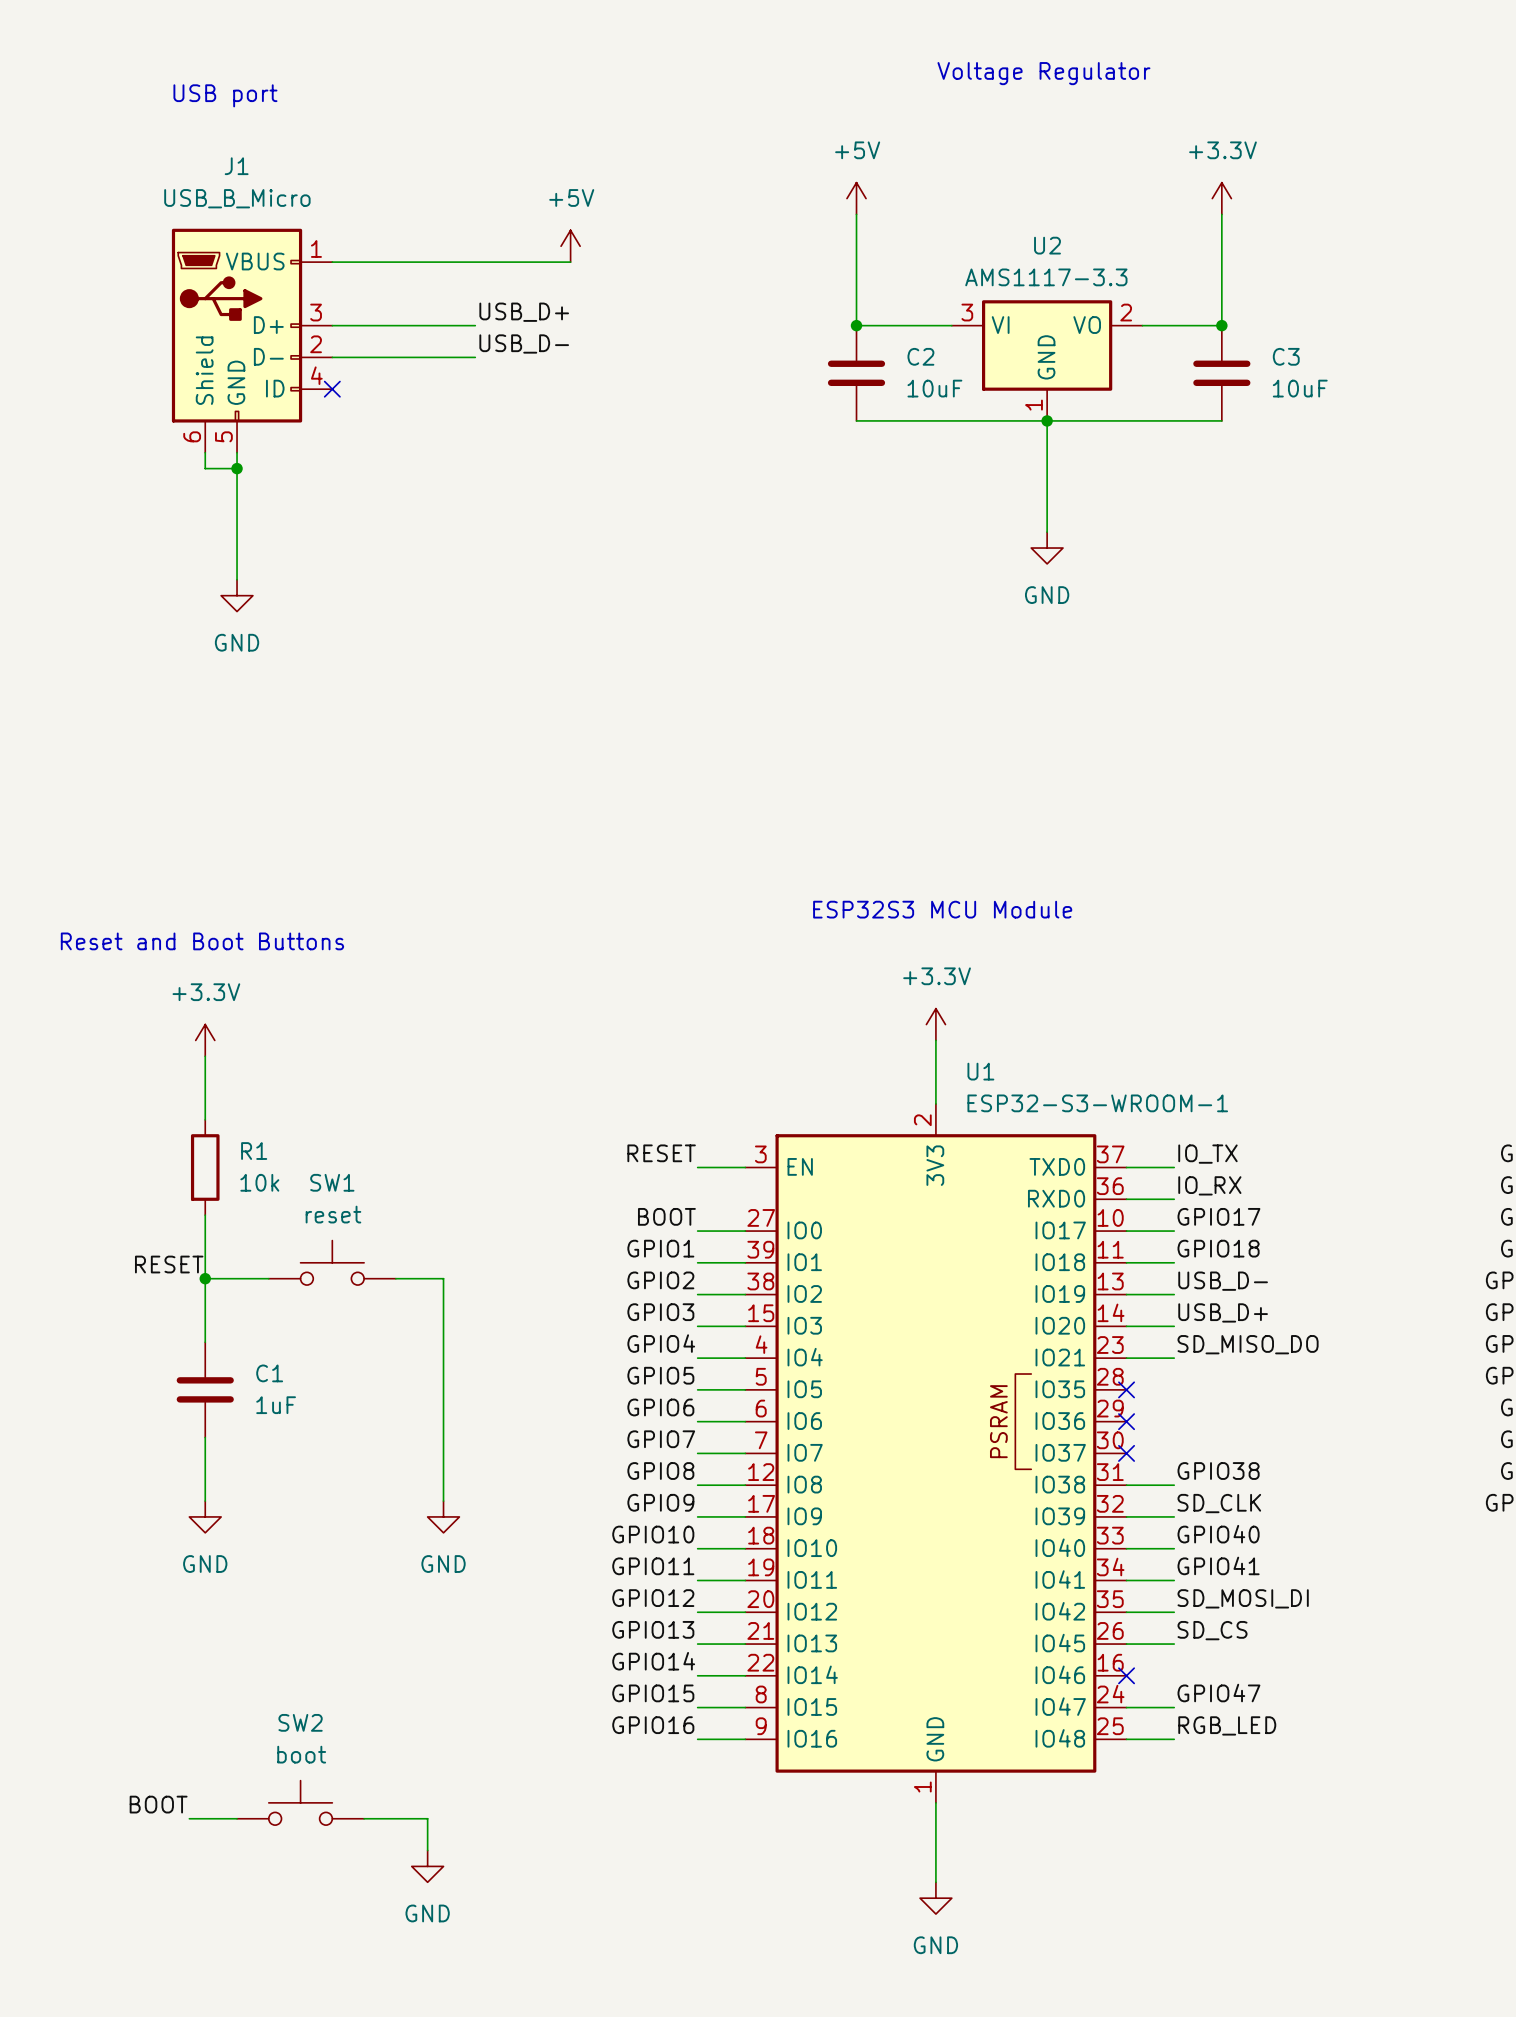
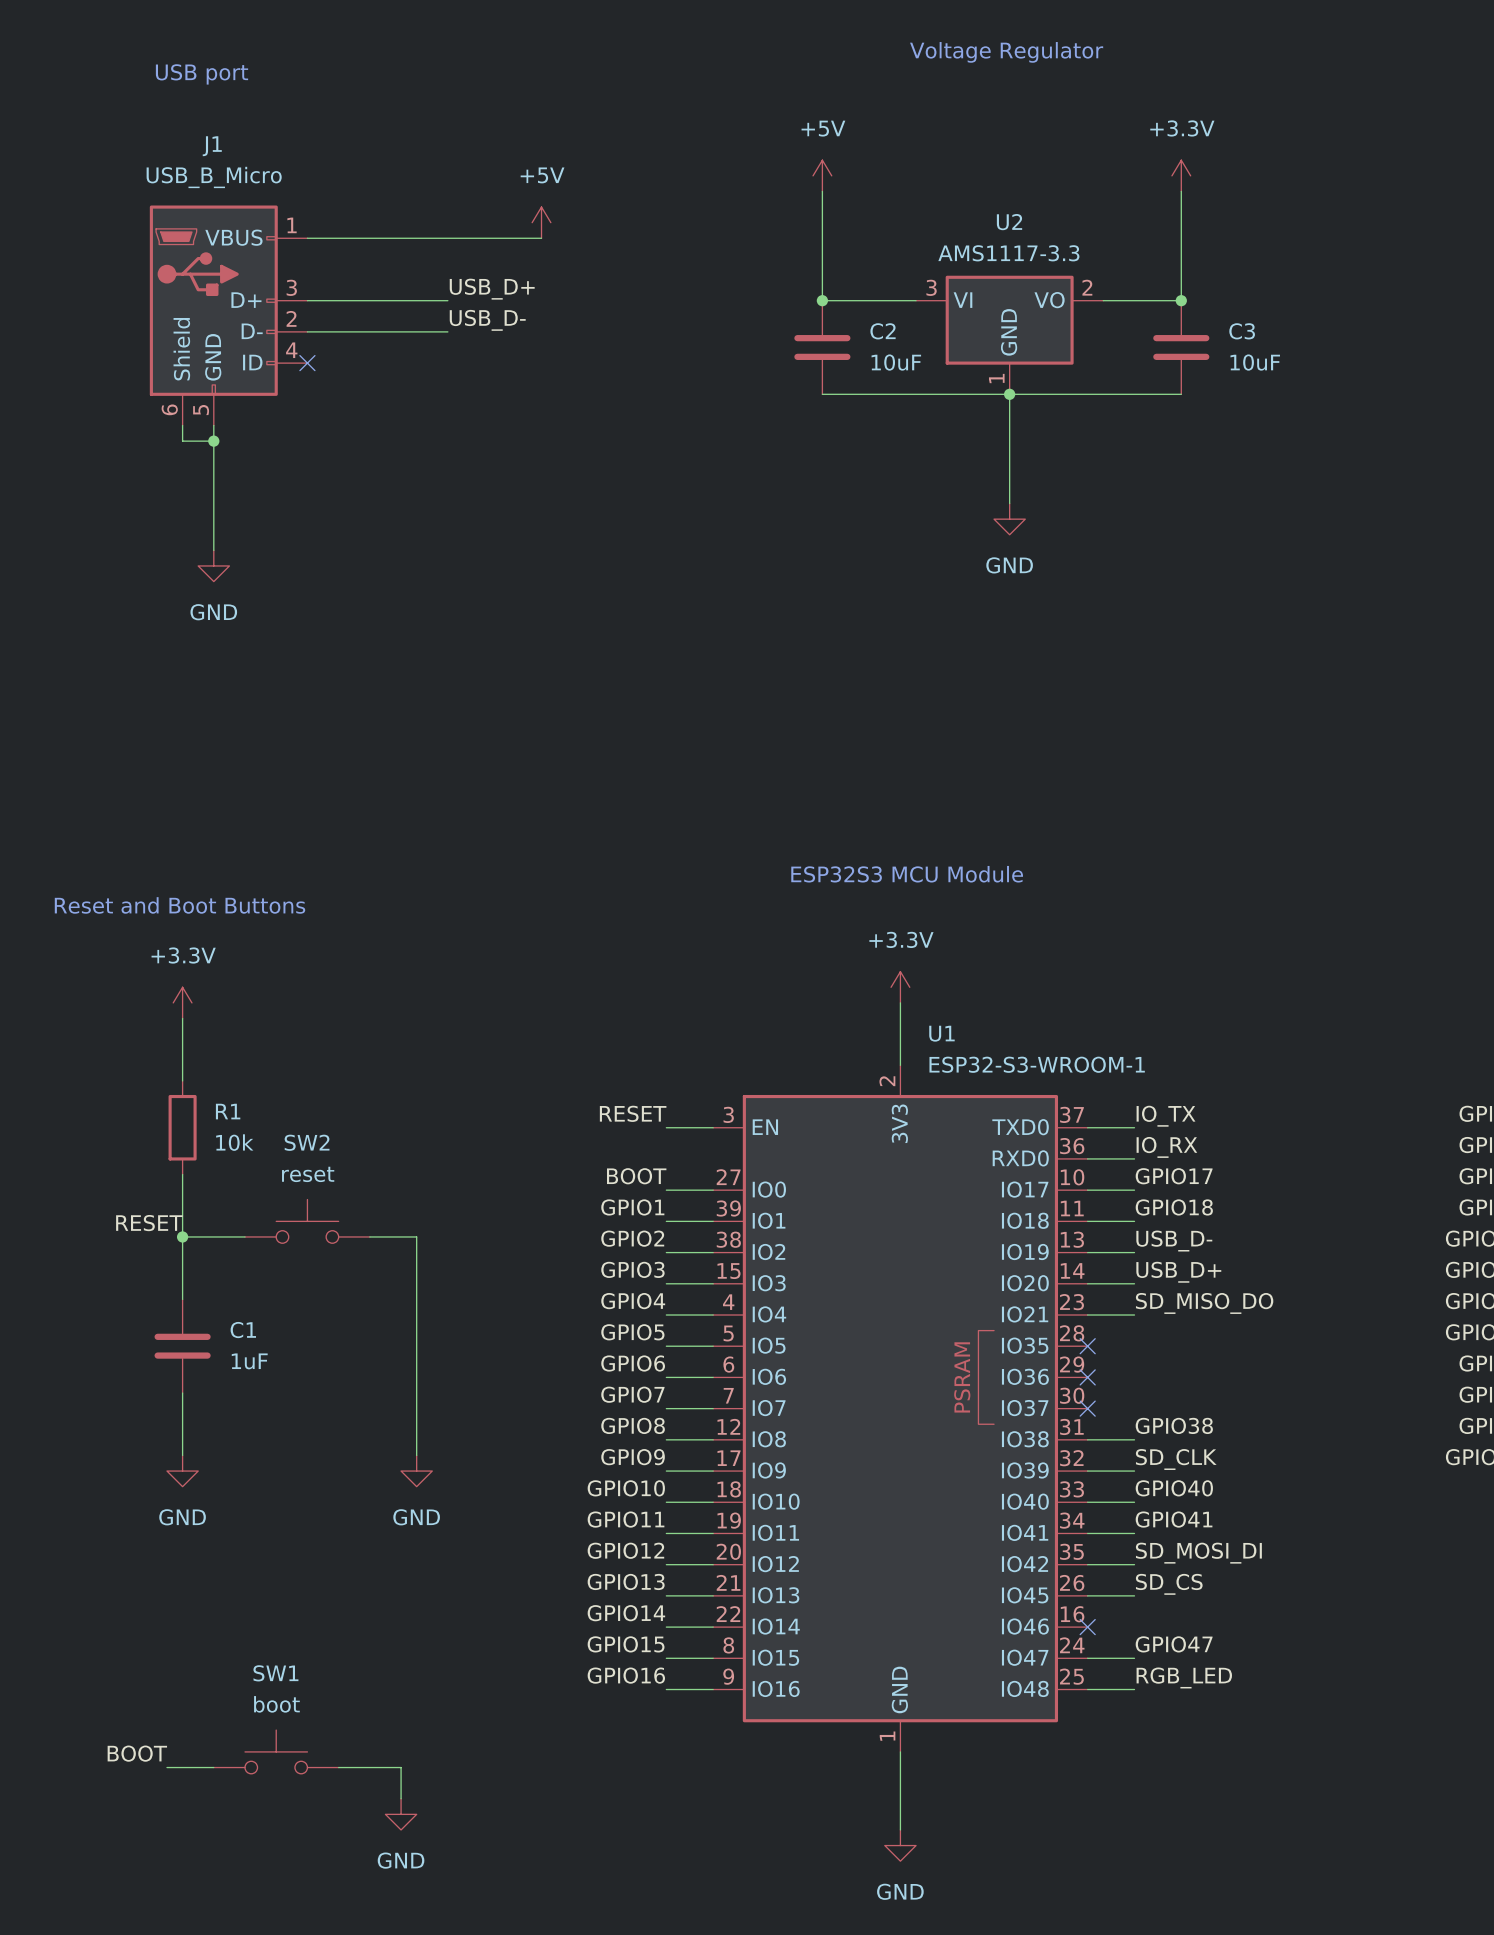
SW1 name: SW1 (332, 1182) -> SW2 (307, 1142)
SW2 name: SW2 (300, 1722) -> SW1 (275, 1673)

